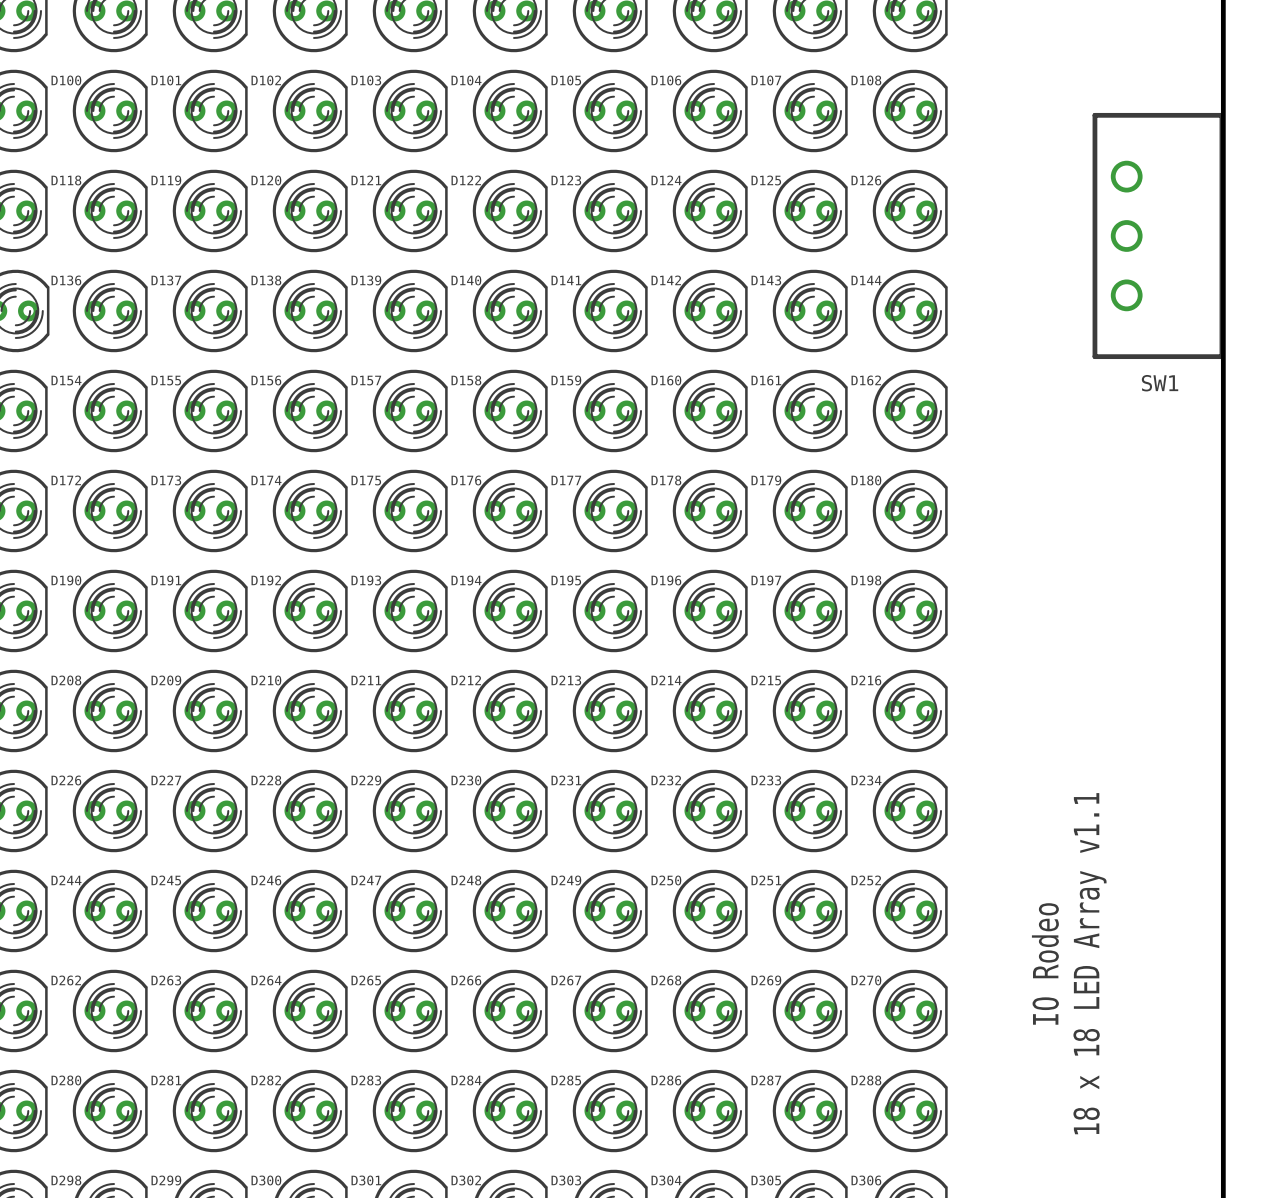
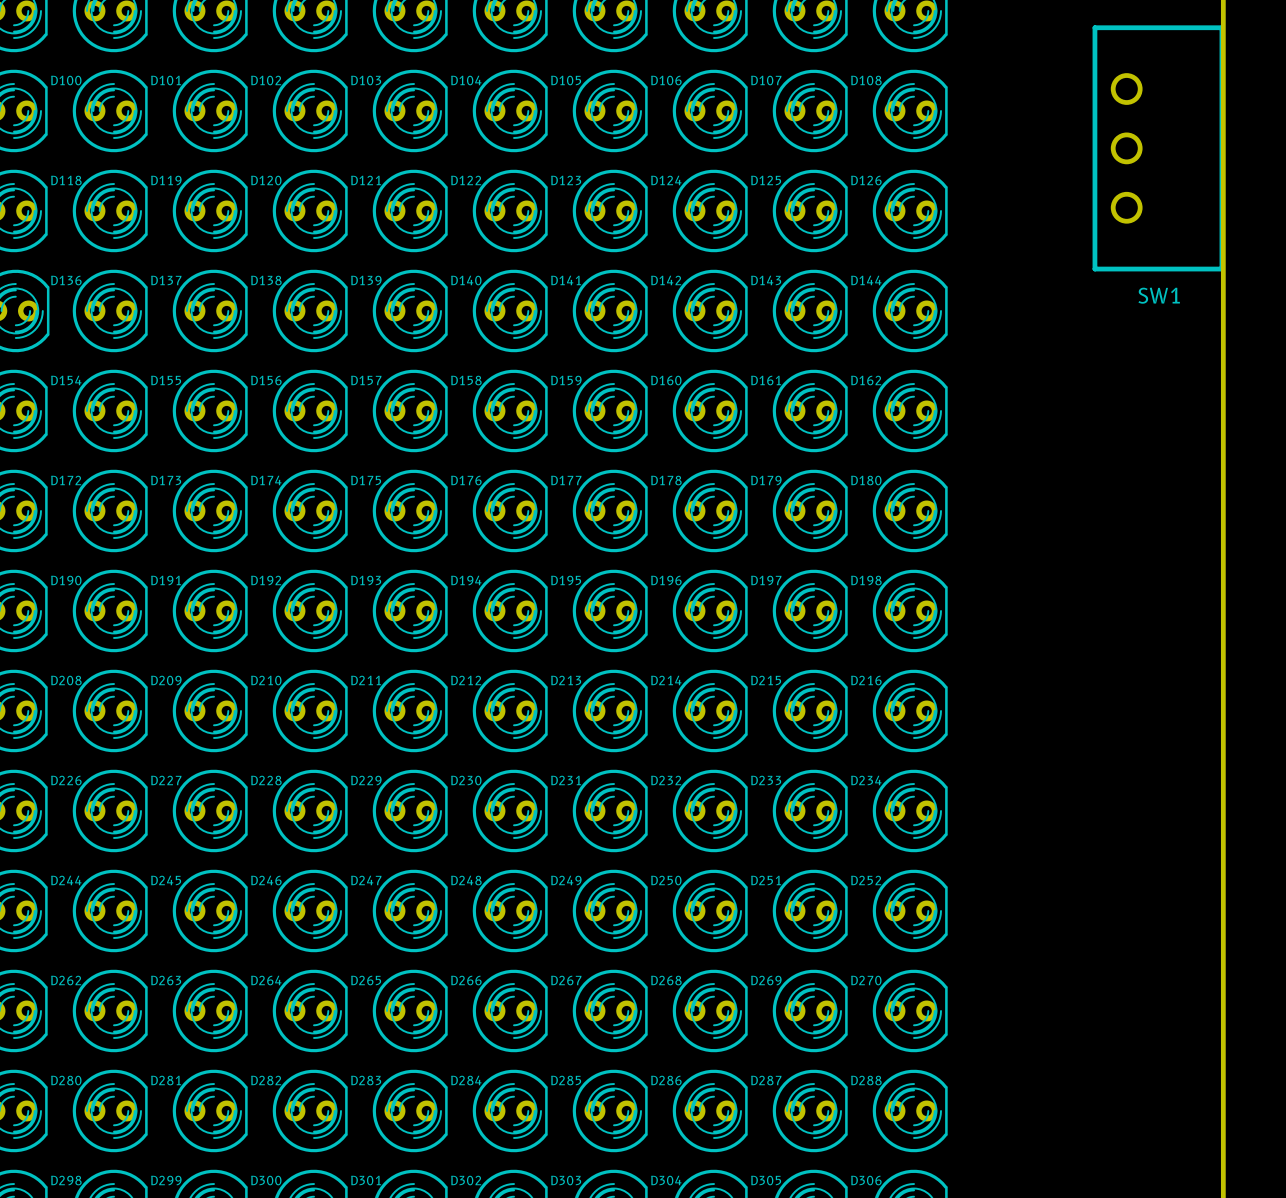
SW1 position: (1158, 235) -> (1158, 148)
text: IO Rodeo (1045, 963) -> none
text: 18 x 18 LED Array v1.1 (1089, 963) -> none

